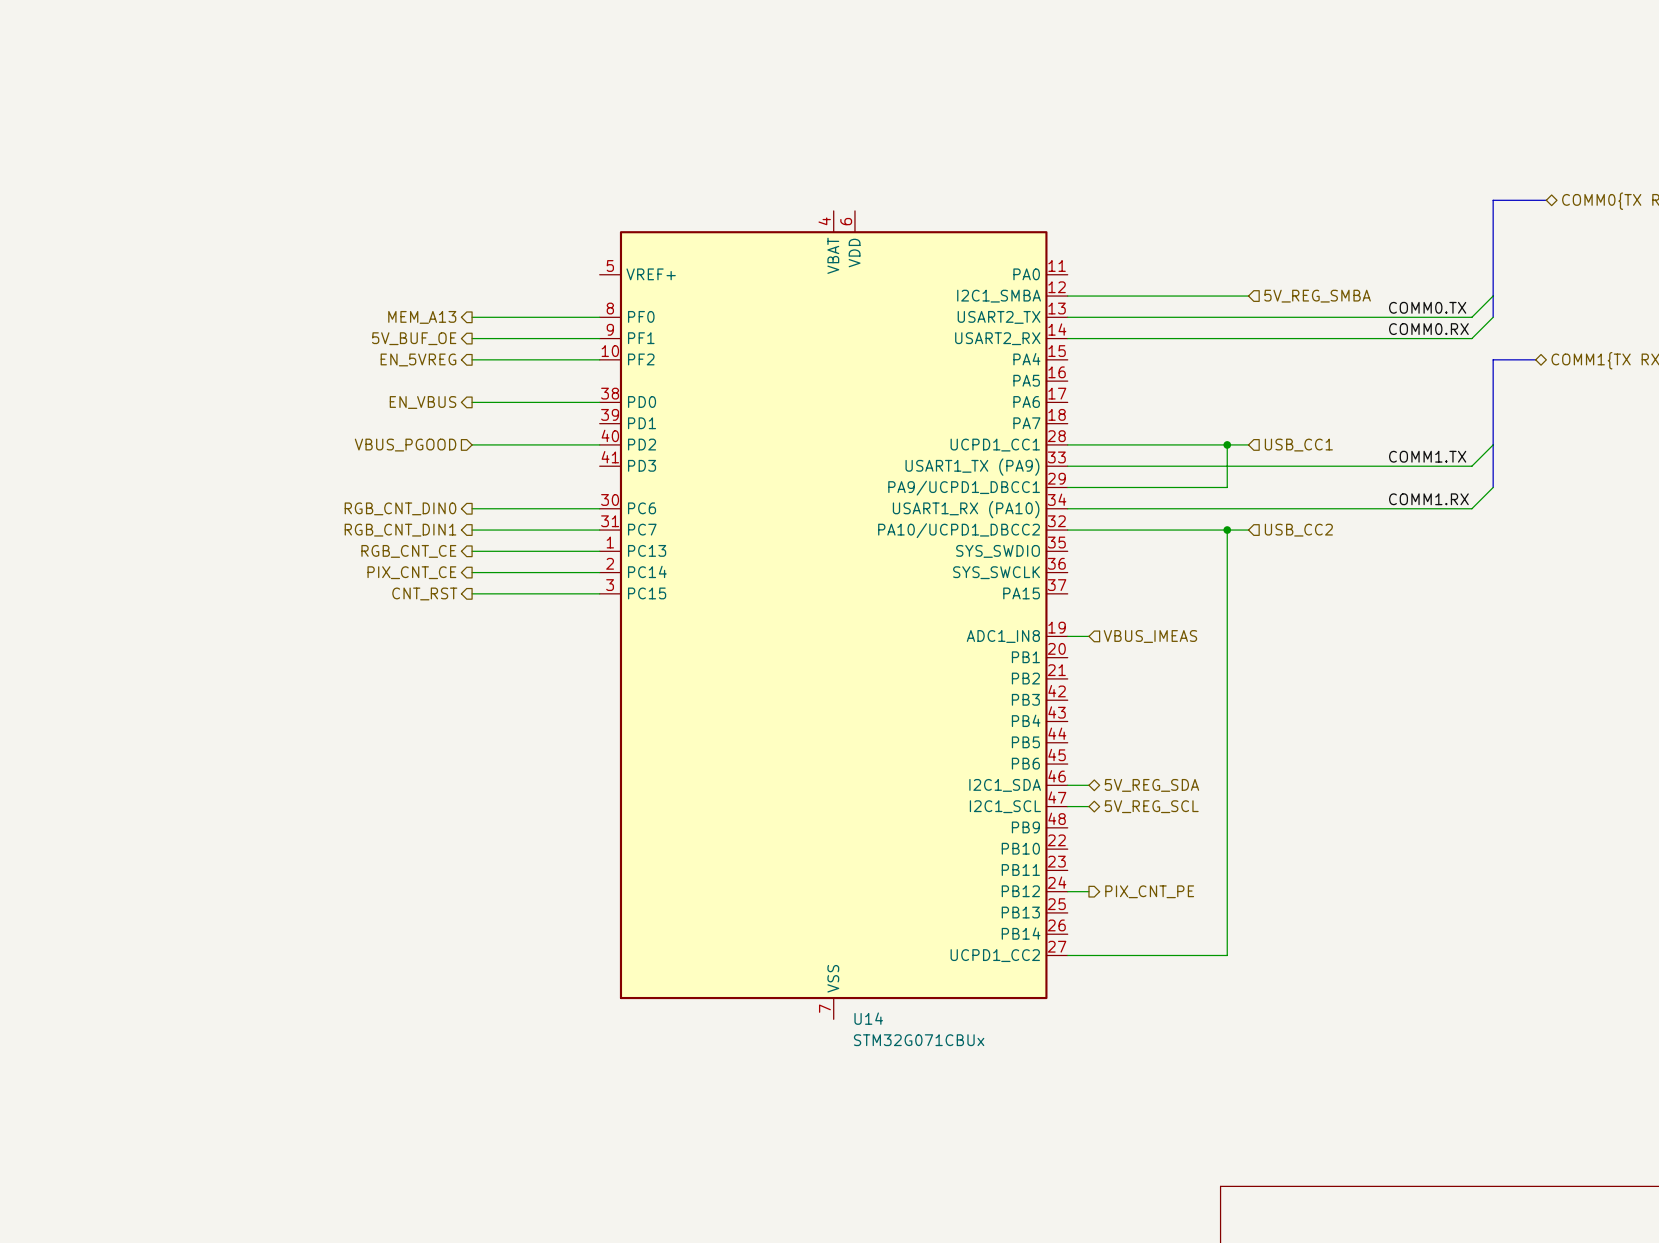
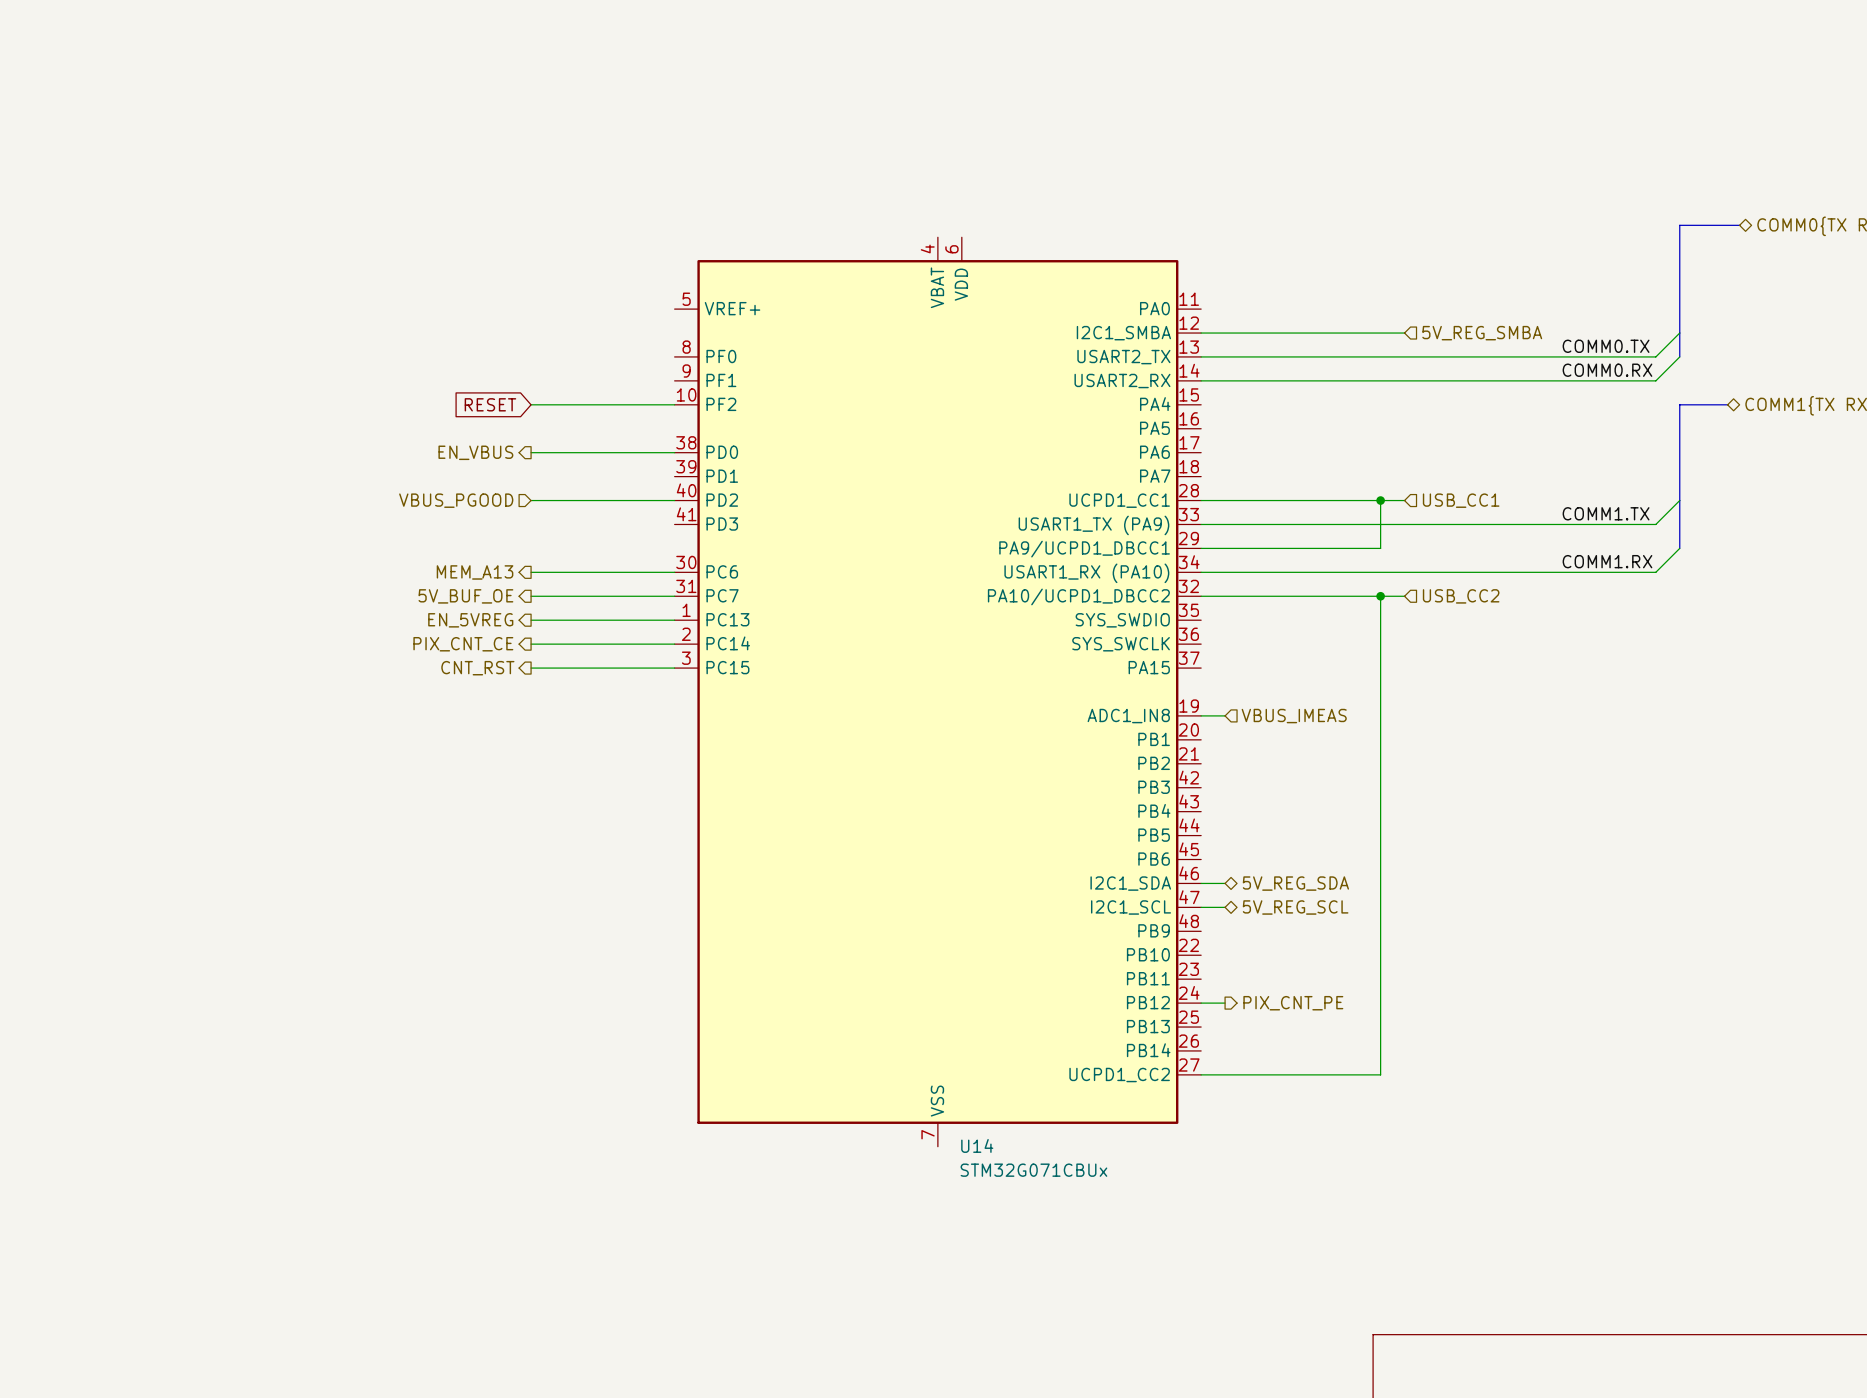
hierarchical label: MEM_A13 (422, 317) -> none
wire: (472, 317) (599, 317) -> none
hierarchical label: 5V_BUF_OE (414, 338) -> none
wire: (472, 338) (599, 338) -> none
hierarchical label: EN_5VREG (418, 359) -> none
global label: none -> RESET (490, 404)
hierarchical label: RGB_CNT_DIN0 (400, 508) -> MEM_A13 (475, 572)
hierarchical label: RGB_CNT_DIN1 (400, 530) -> 5V_BUF_OE (465, 596)
hierarchical label: RGB_CNT_CE (408, 551) -> EN_5VREG (470, 620)

